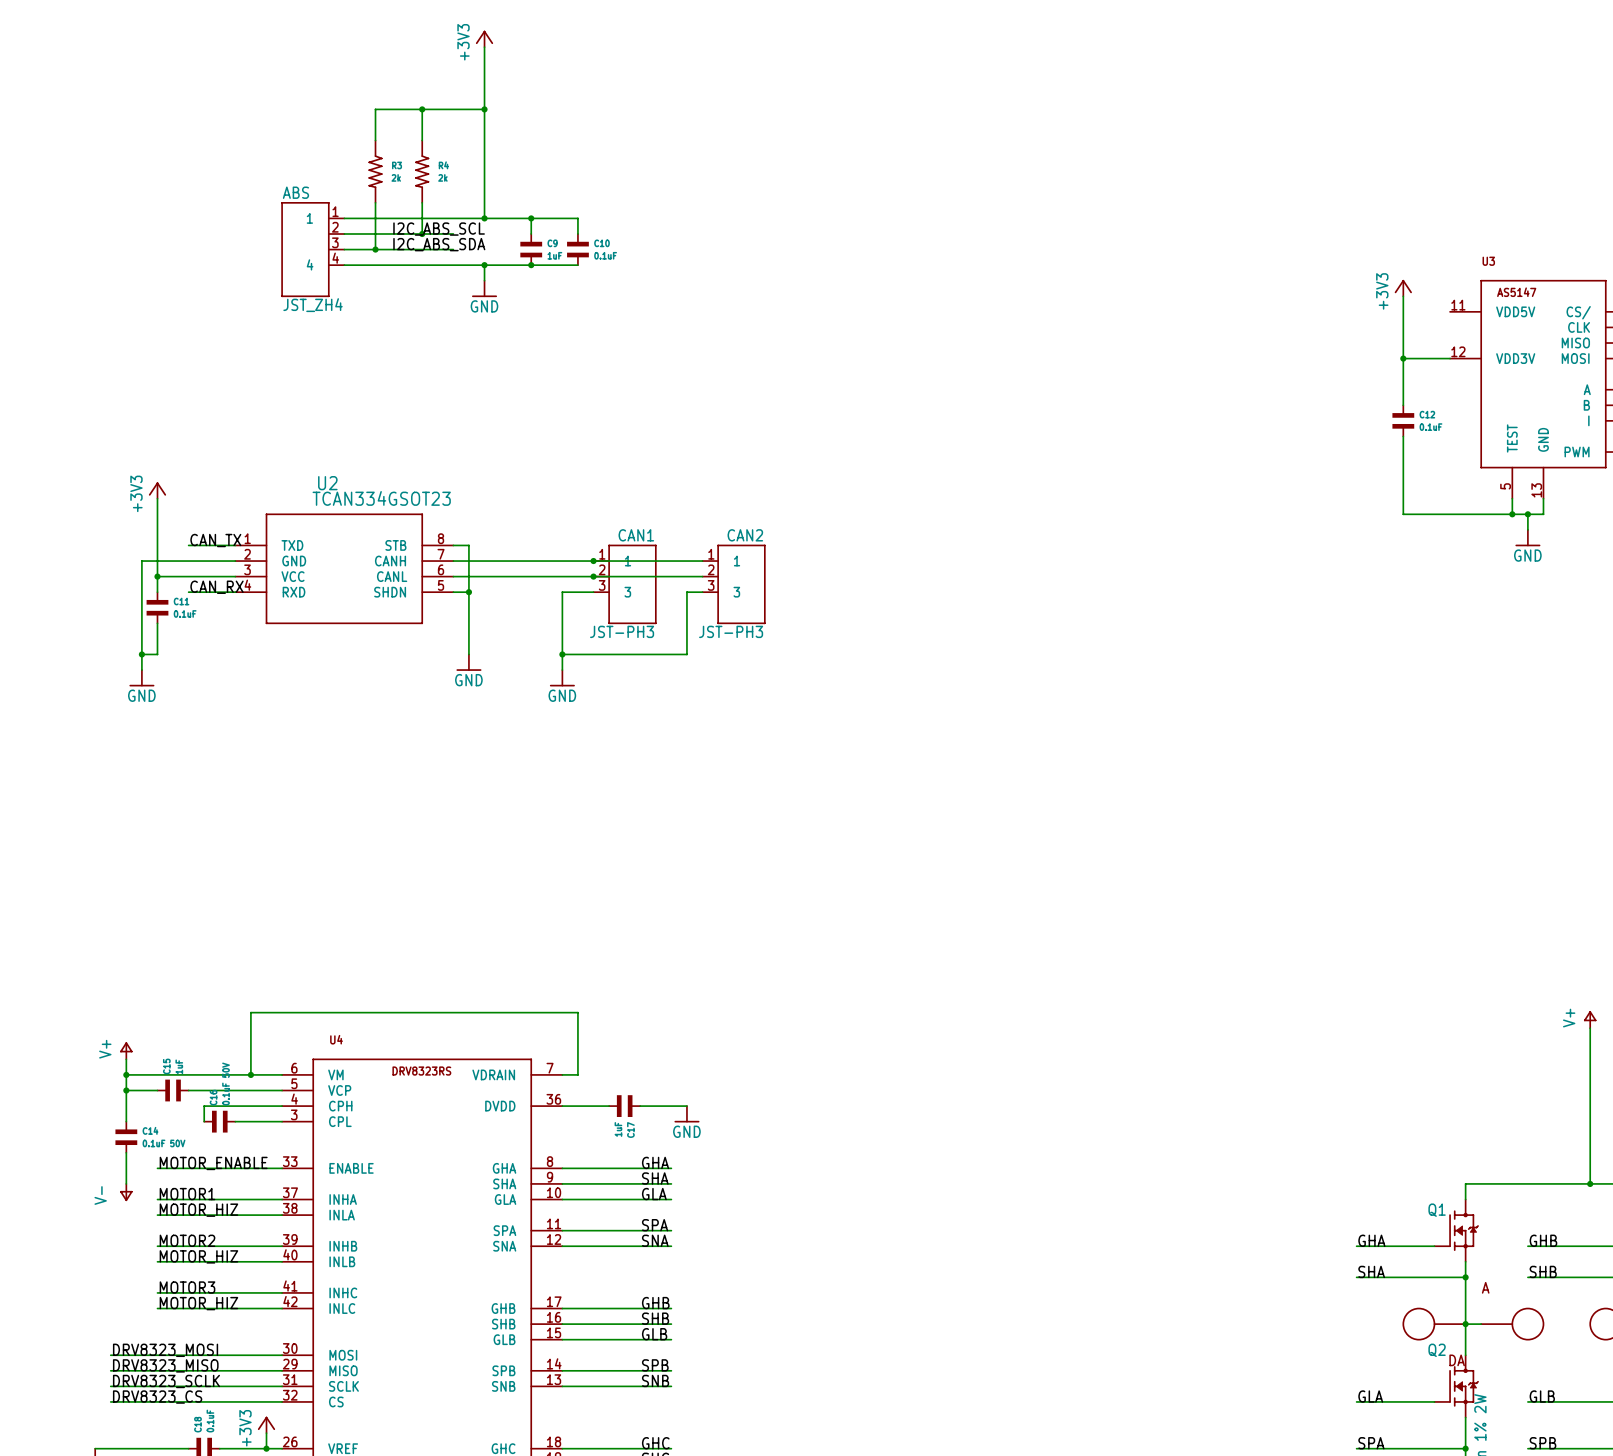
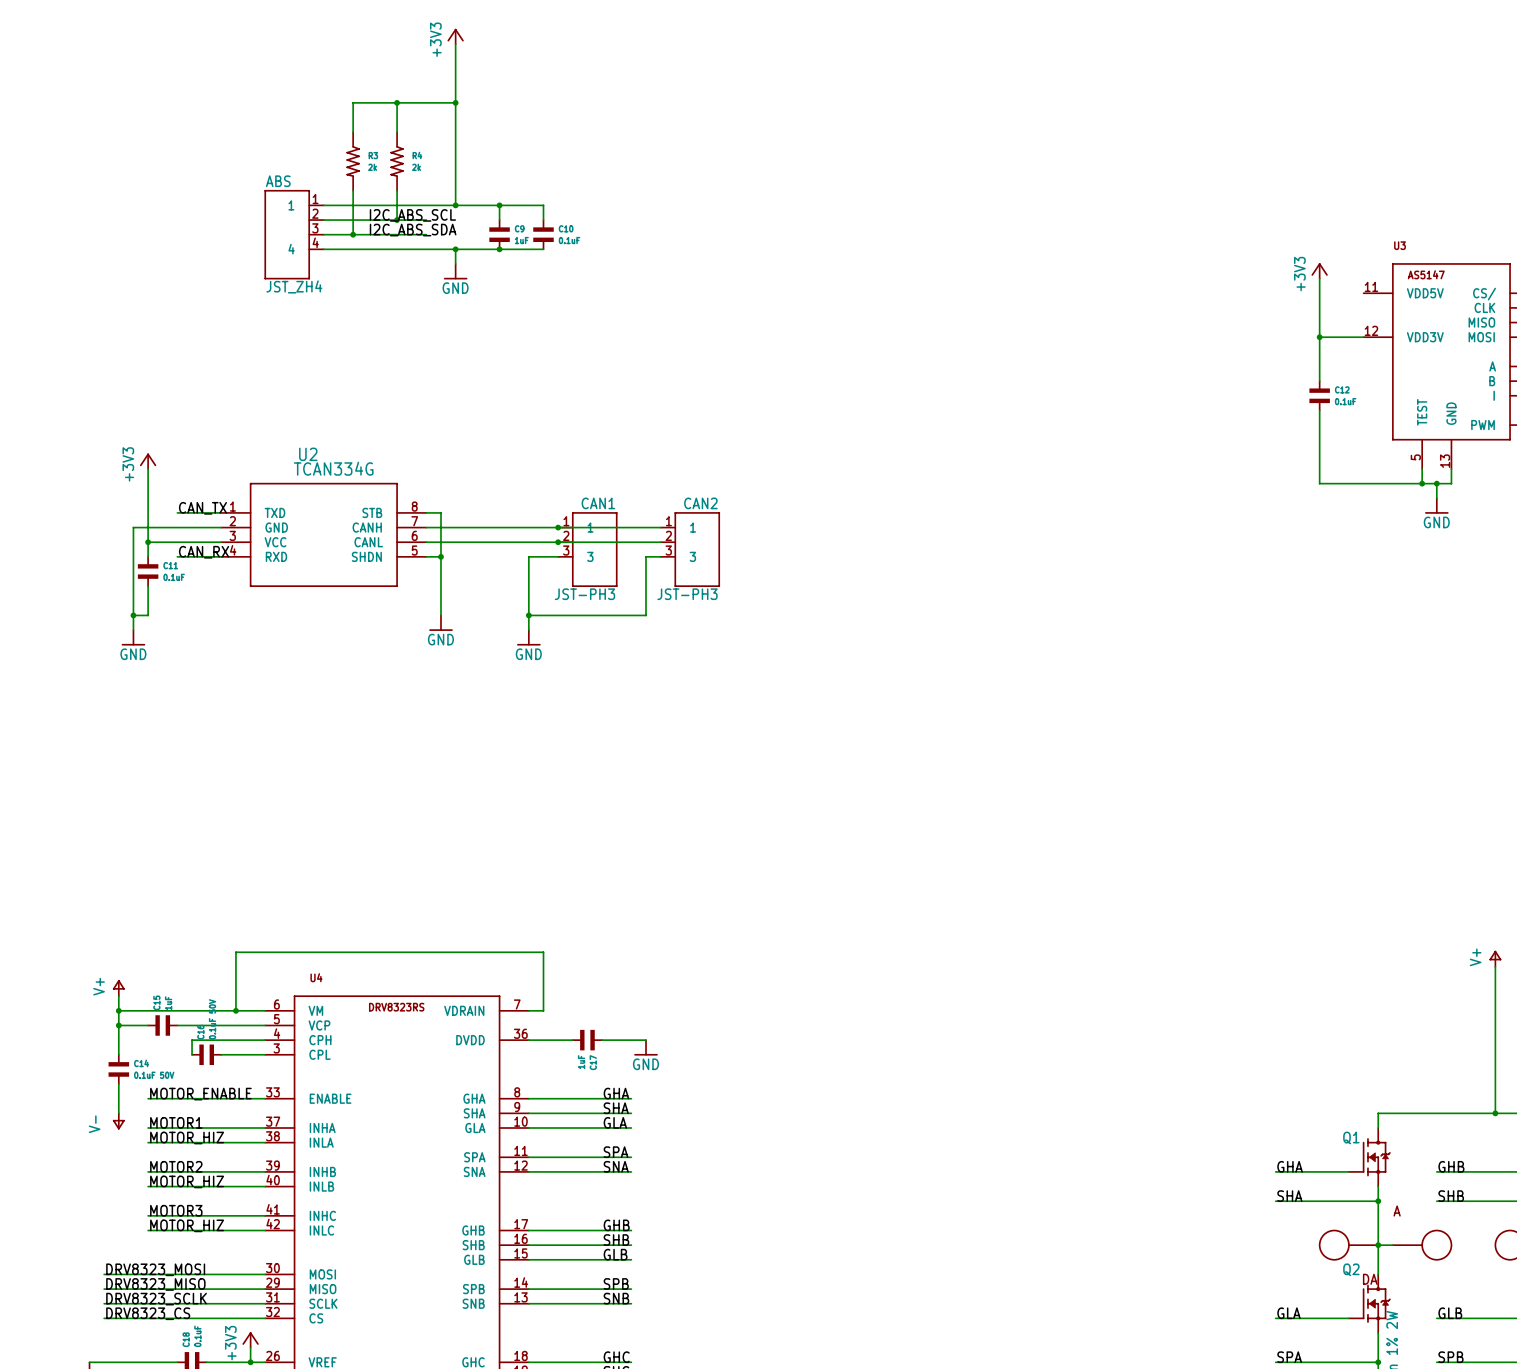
U2 value: TCAN334GSOT23 (381, 498) -> TCAN334G (333, 468)

